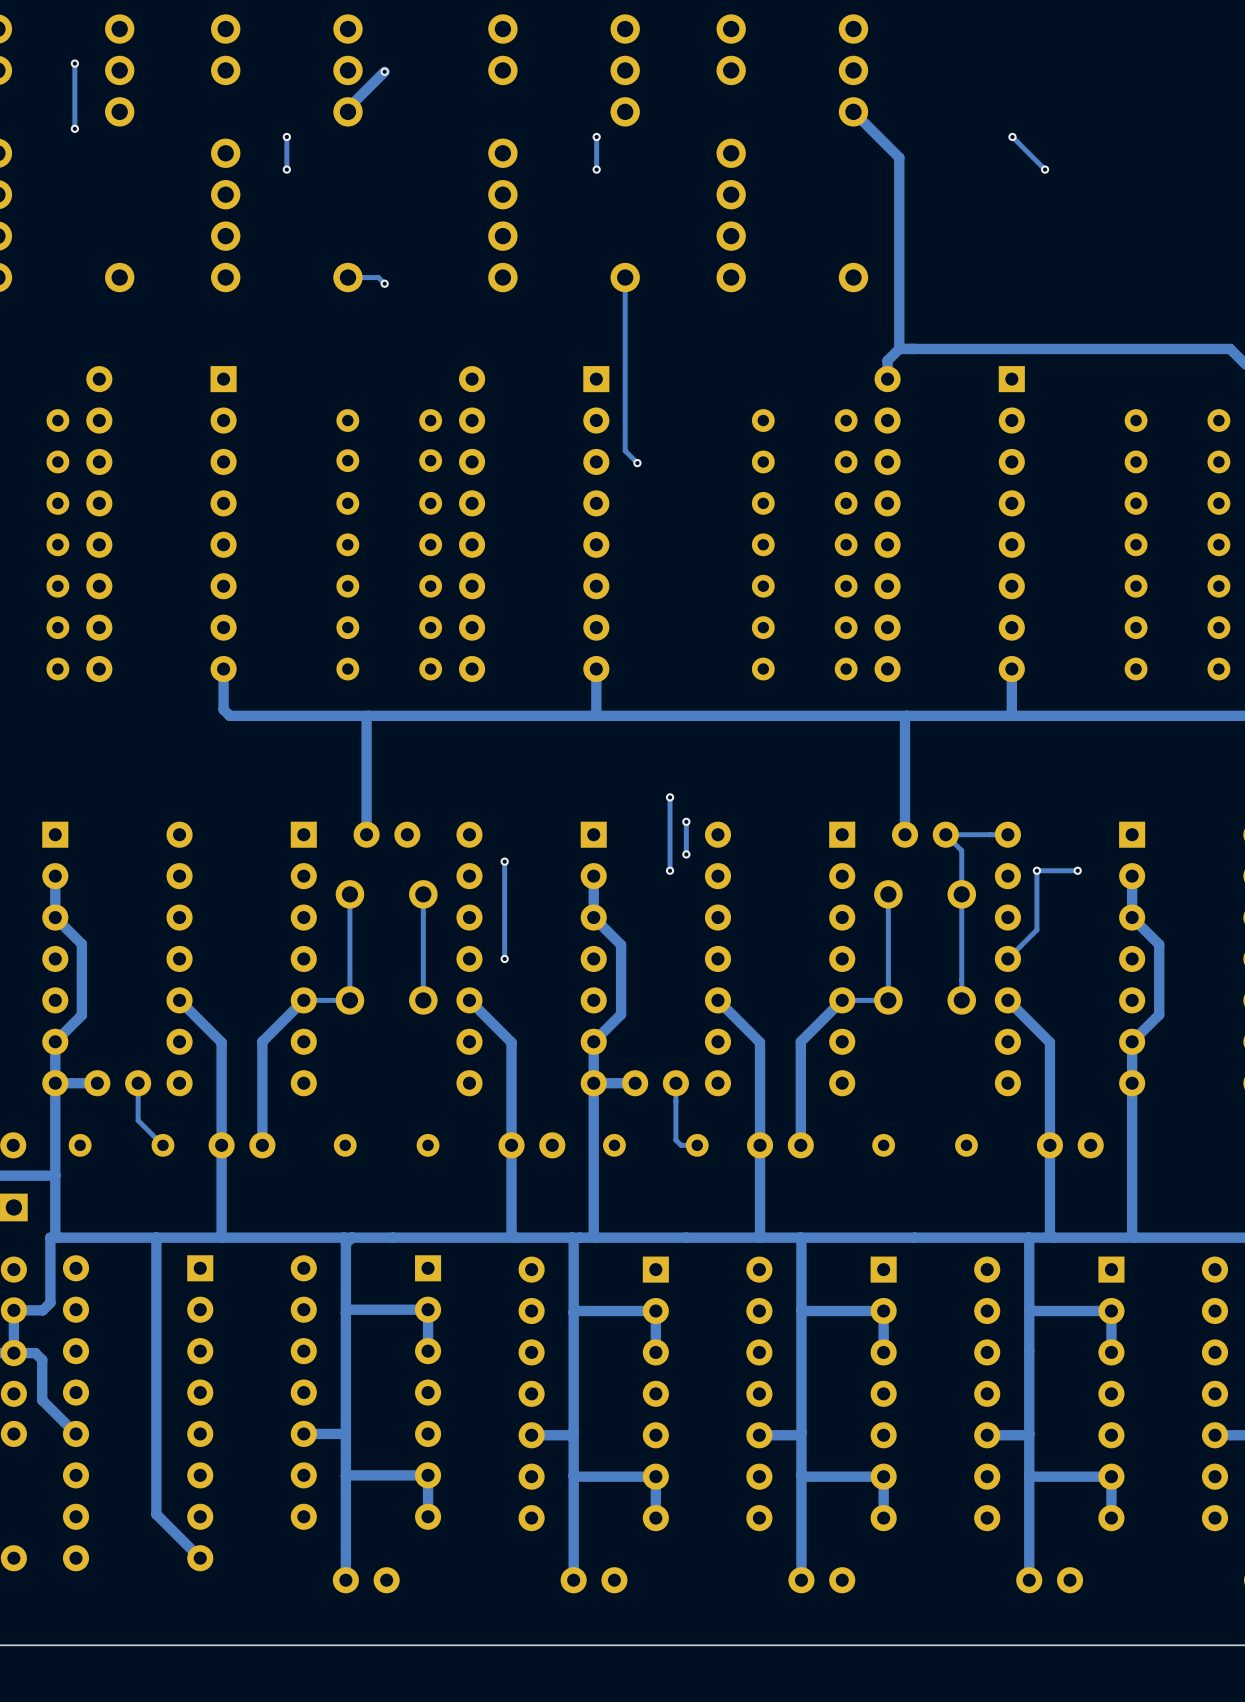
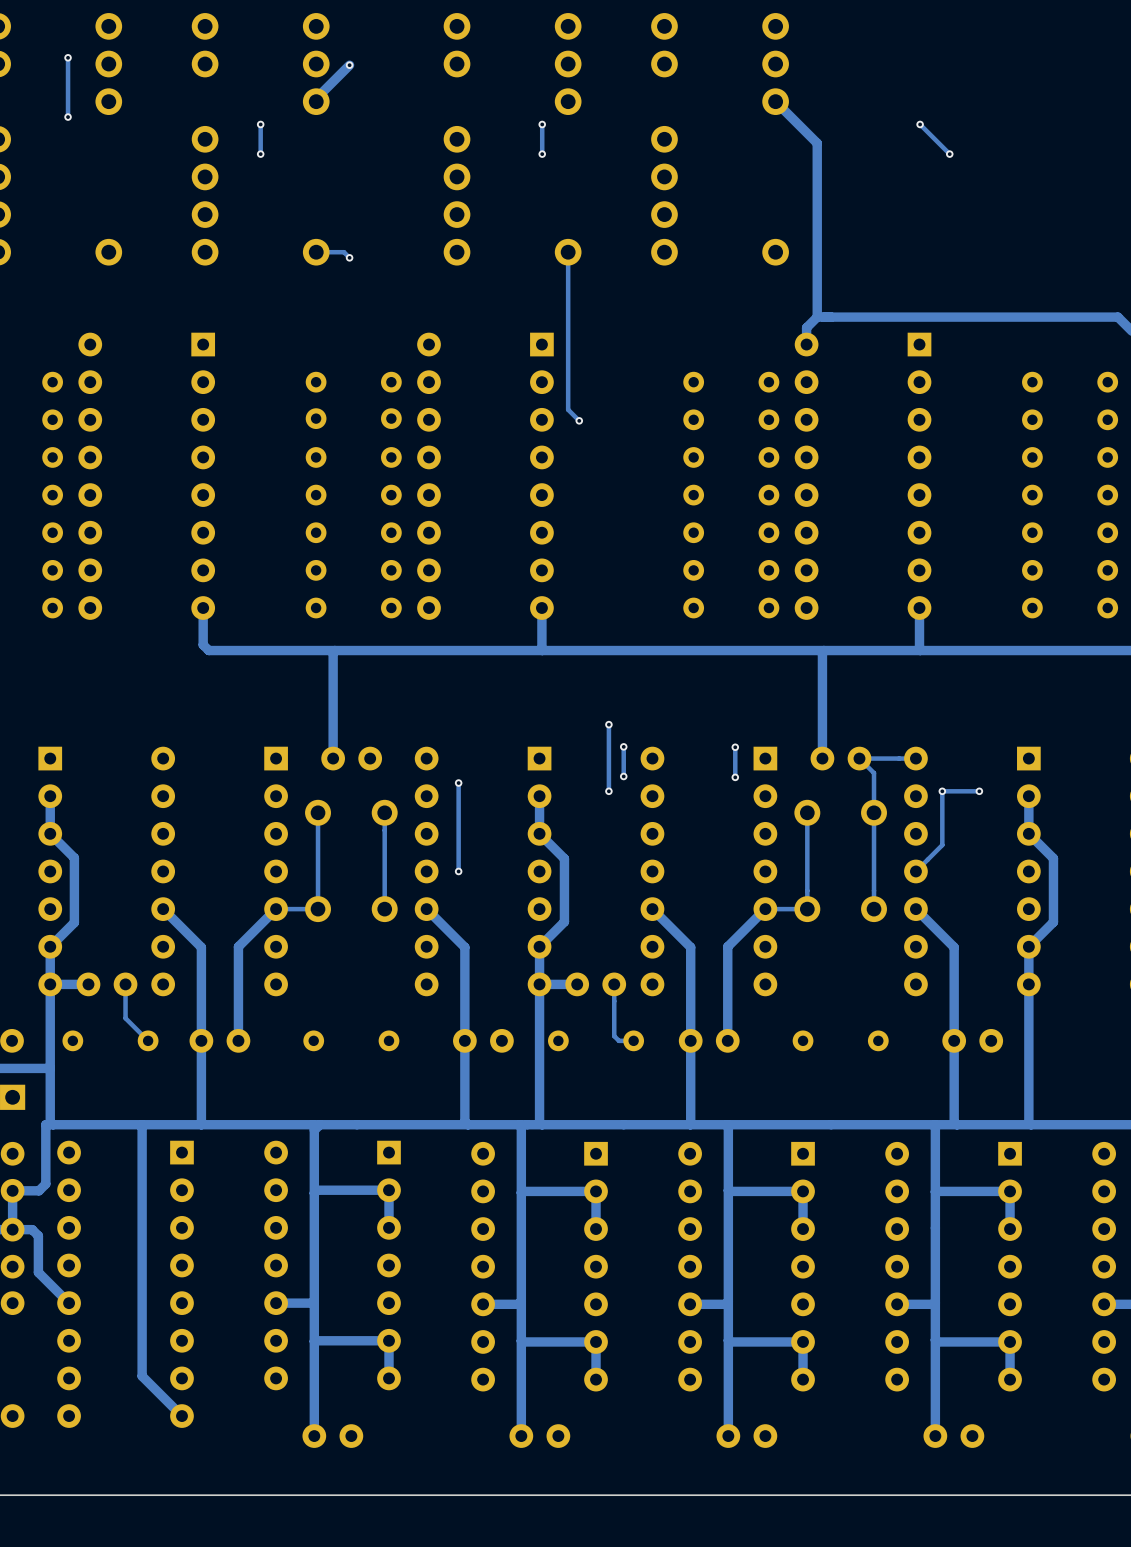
track: none -> (735, 747) (735, 777)
via: none -> (735, 747)
via: none -> (735, 777)

